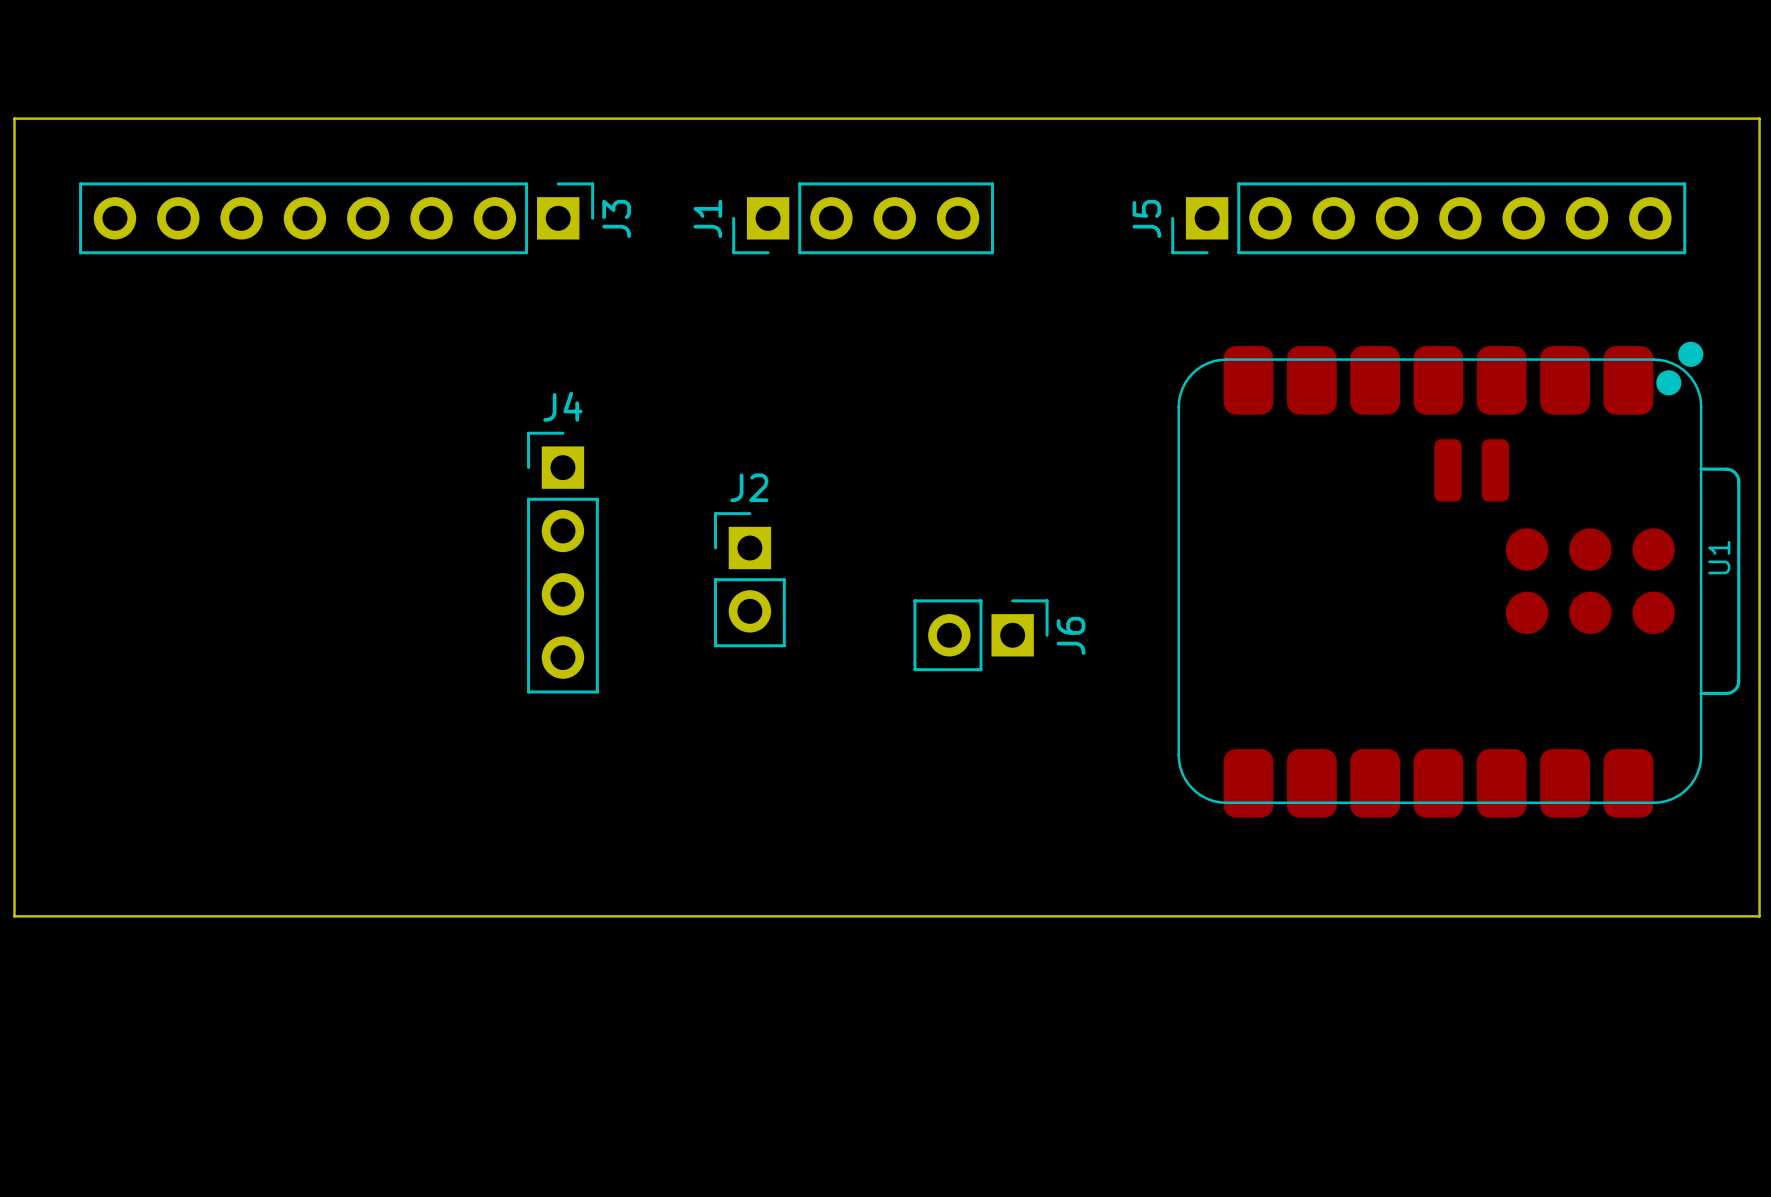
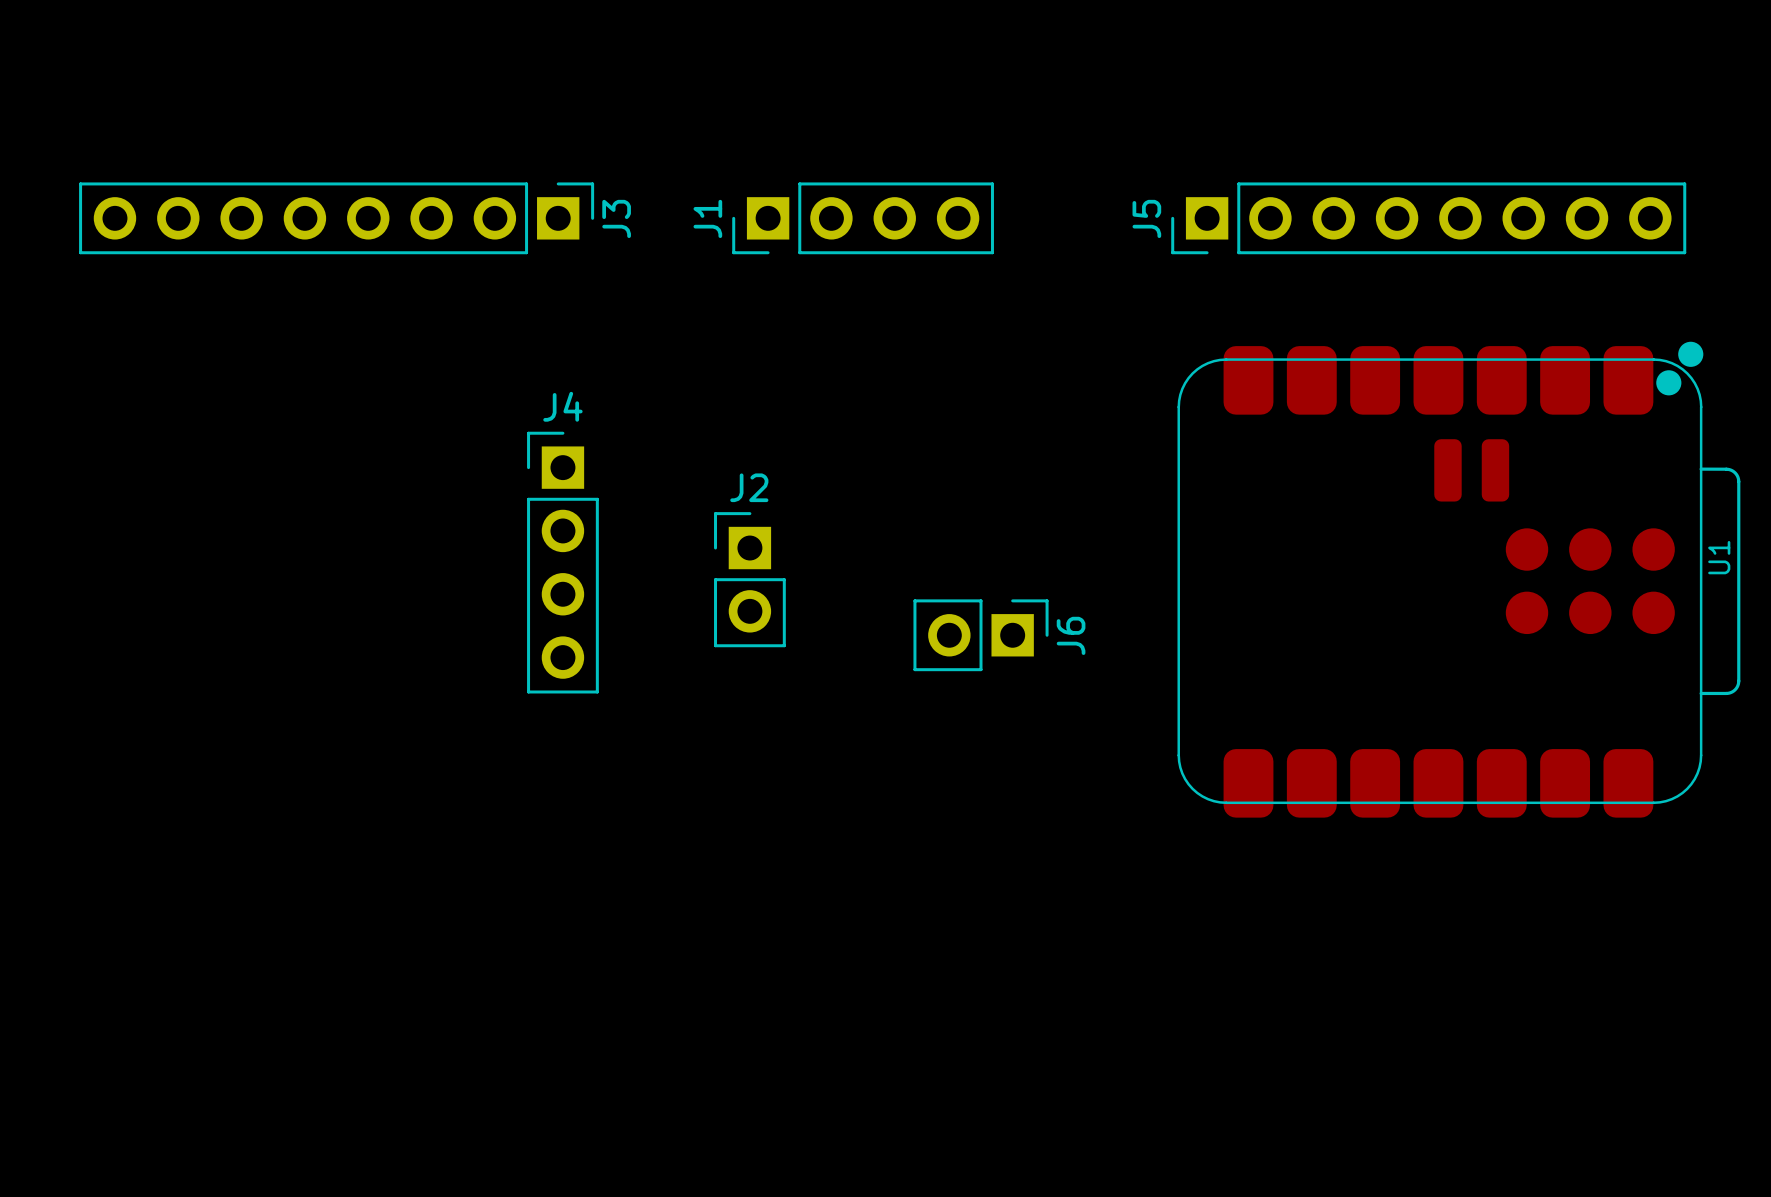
board edge: (14, 118) (1759, 118) (1759, 916) (14, 916) (14, 118) -> none

